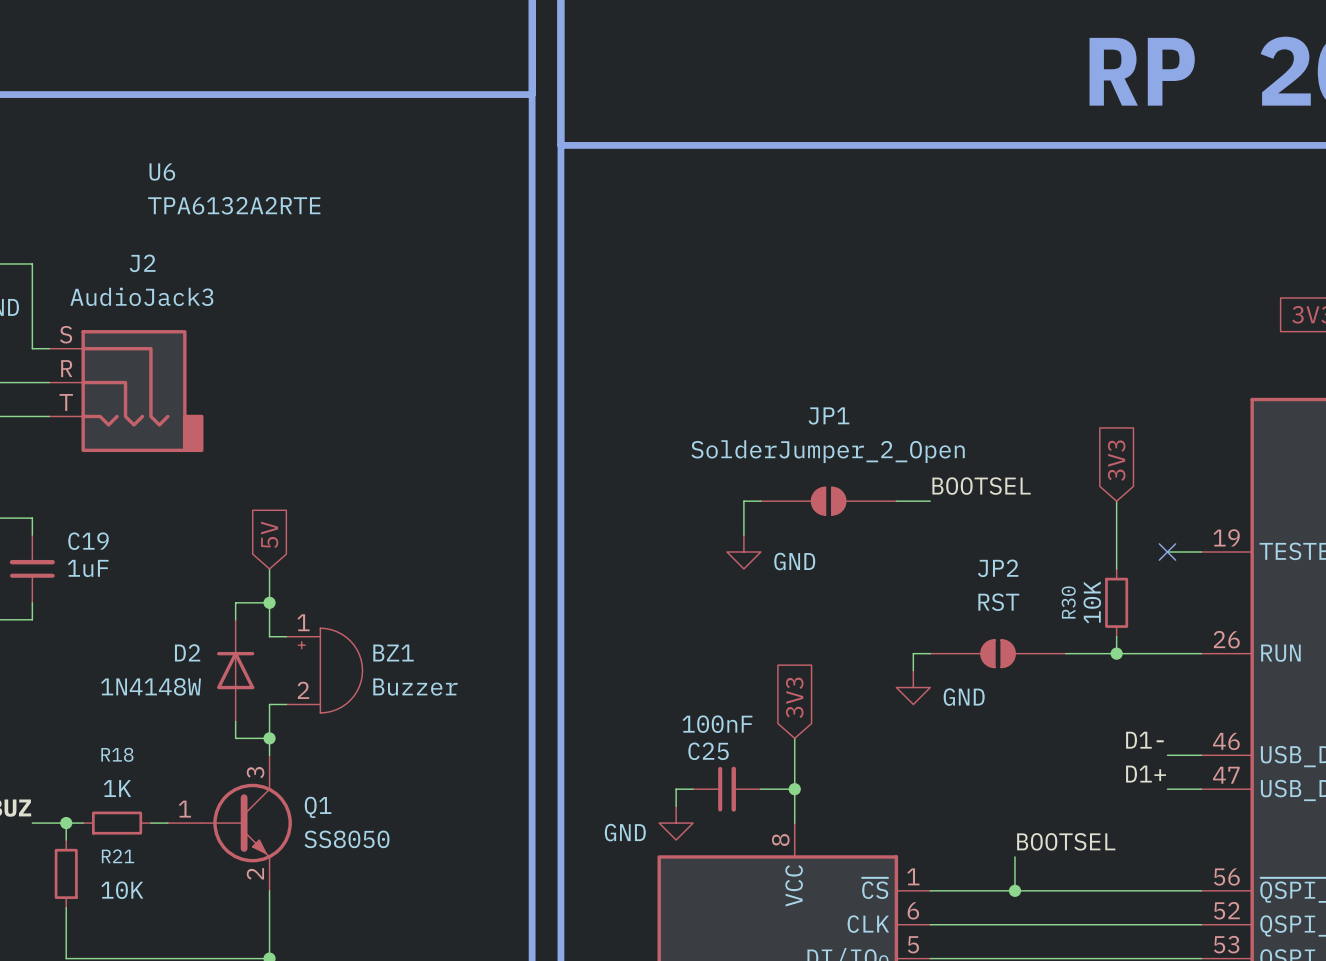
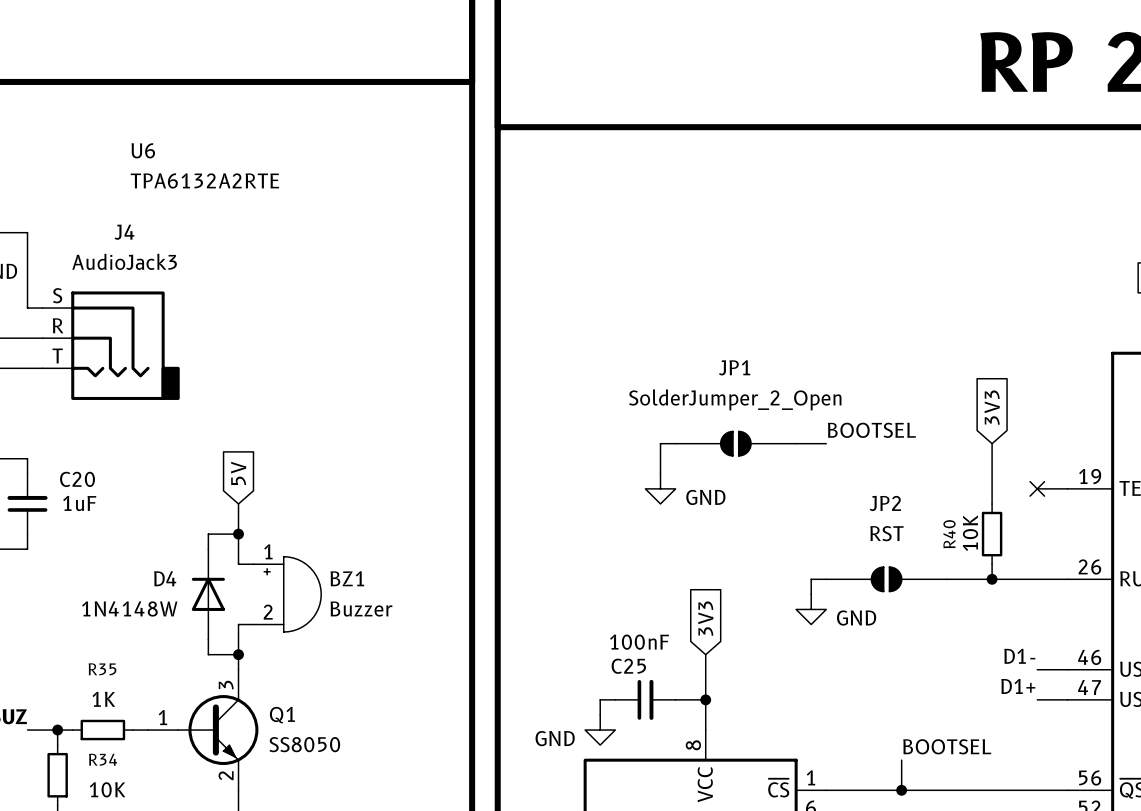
J2 name: J2 (142, 263) -> J4 (124, 232)
C19 name: C19 (88, 541) -> C20 (77, 479)
R30 name: R30 (1068, 602) -> R40 (949, 534)
D2 name: D2 (187, 652) -> D4 (165, 578)
R18 name: R18 (117, 754) -> R35 (102, 669)
R21 name: R21 (118, 856) -> R34 (103, 759)

